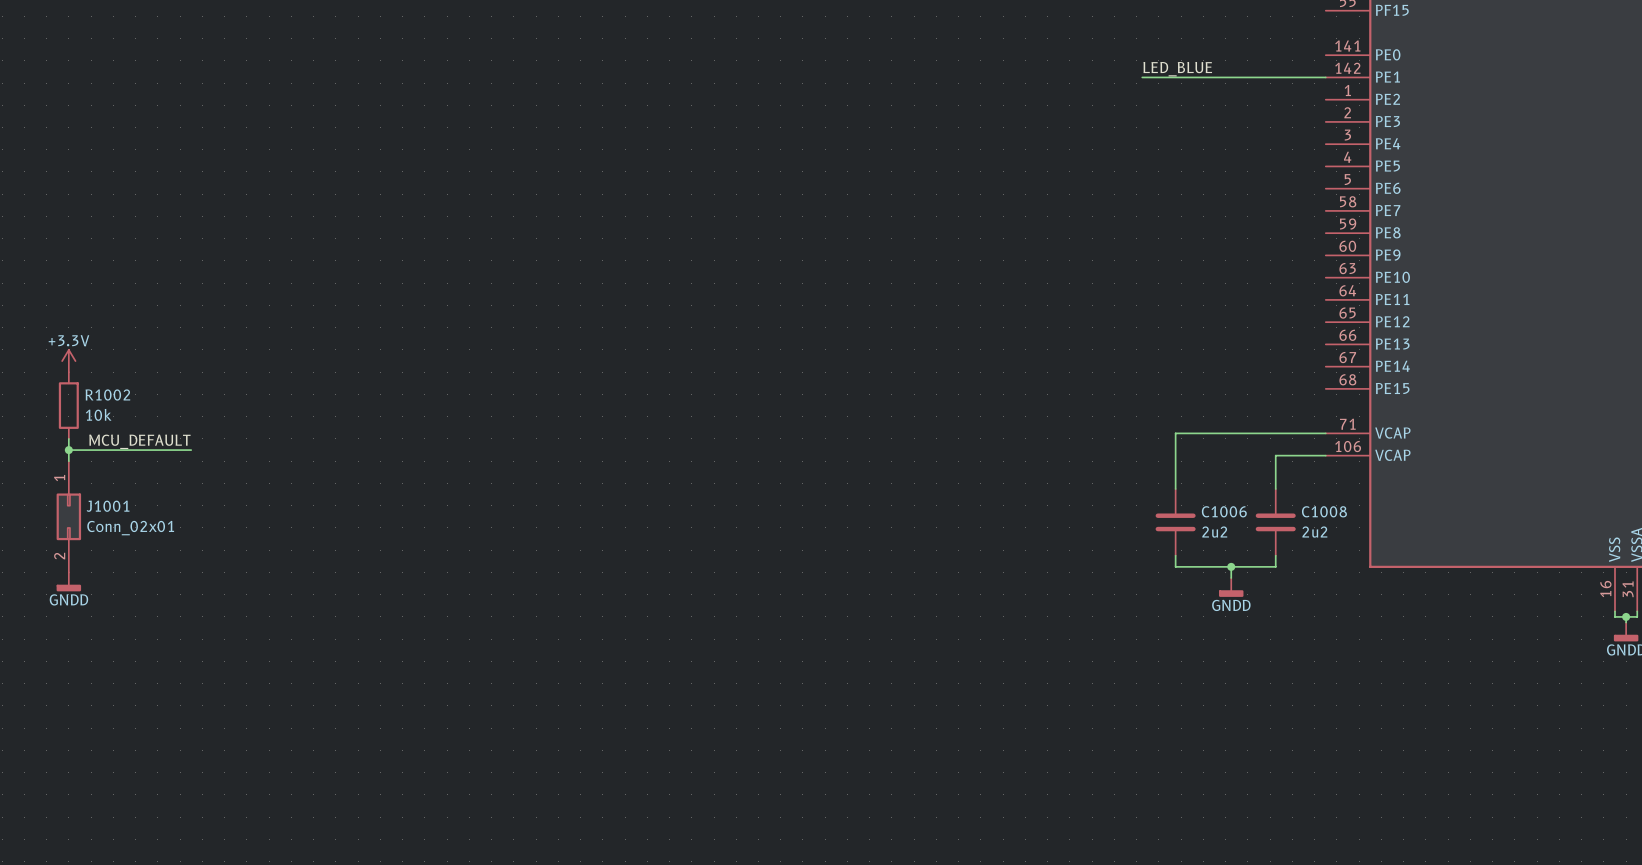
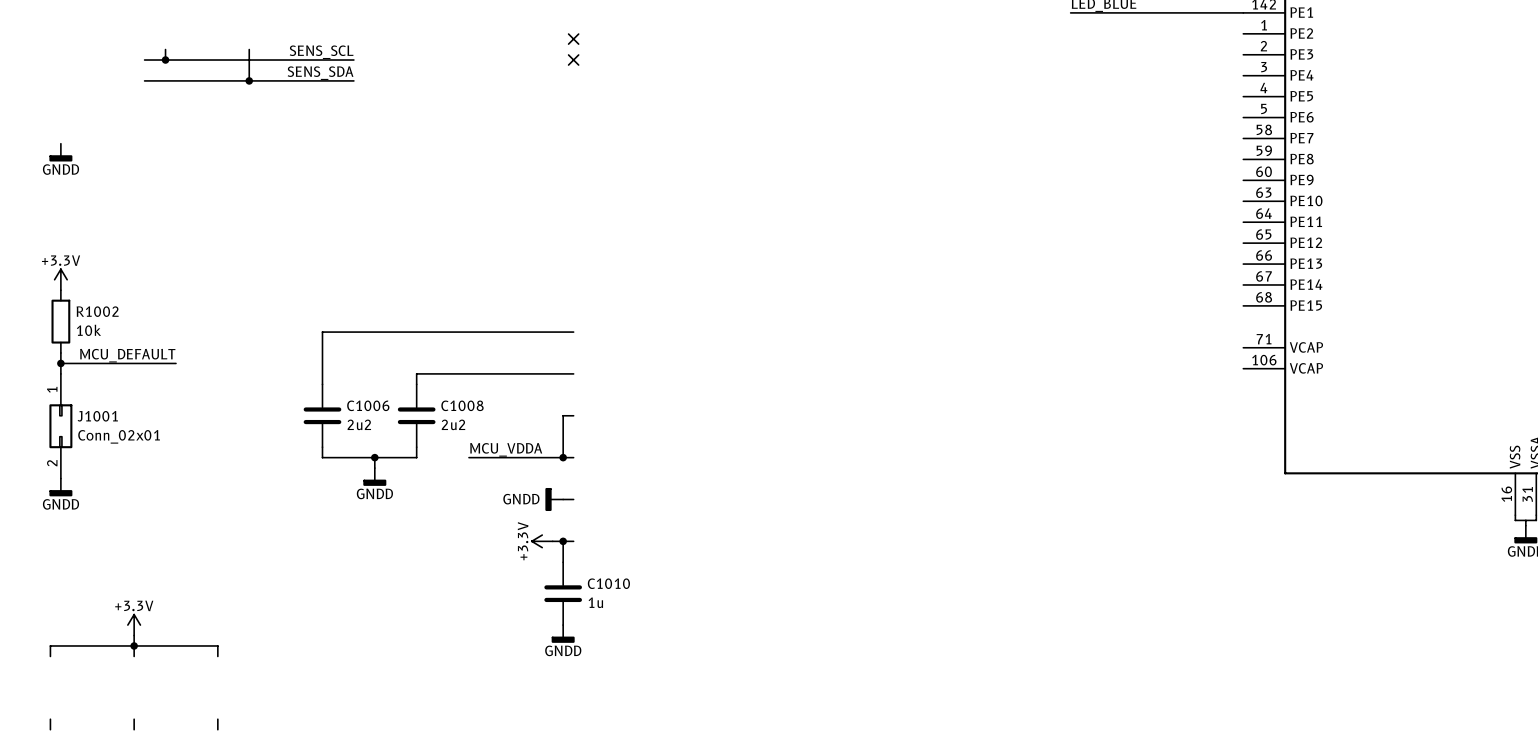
no-connect mark: none -> (573, 39)
wire: none -> (165, 49) (165, 60)
wire: none -> (249, 49) (249, 80)
label: none -> SENS_SCL (321, 52)
wire: none -> (144, 60) (353, 60)
junction: none -> (165, 60)
no-connect mark: none -> (573, 60)
label: none -> SENS_SDA (320, 73)
wire: none -> (144, 80) (353, 80)
junction: none -> (249, 80)
power symbol: none -> GNDD (60, 152)
wire: none -> (573, 332) (322, 332) (322, 384)
wire: (1325, 433) (1175, 433) (1175, 489) -> none
wire: (1325, 455) (1275, 455) (1275, 489) -> none
wire: none -> (573, 373) (416, 373) (416, 384)
wire: none -> (573, 415) (563, 415) (563, 457)
C1006 position: (1175, 522) -> (322, 415)
C1008 position: (1275, 522) -> (416, 415)
wire: none -> (322, 447) (322, 457) (416, 457) (416, 447)
label: none -> MCU_VDDA (506, 449)
wire: none -> (374, 457) (374, 468)
junction: none -> (374, 457)
wire: none -> (468, 457) (573, 457)
junction: none -> (563, 457)
wire: (1175, 555) (1175, 566) (1275, 566) (1275, 555) -> none
wire: (1231, 566) (1231, 578) -> none
junction: (1231, 566) -> none
power symbol: none -> GNDD (374, 476)
power symbol: GNDD (1231, 587) -> none
power symbol: none -> GNDD (554, 499)
wire: none -> (563, 499) (573, 499)
junction: (1626, 616) -> none
power symbol: none -> +3.3V (542, 541)
wire: none -> (552, 541) (573, 541)
wire: none -> (563, 541) (563, 562)
junction: none -> (563, 541)
C1010: none -> 1u (563, 593)
power symbol: none -> +3.3V (134, 625)
power symbol: none -> GNDD (563, 633)
wire: none -> (134, 635) (134, 656)
junction: none -> (134, 645)
wire: none -> (50, 656) (50, 645) (217, 645) (217, 656)
wire: none -> (50, 719) (50, 729)
wire: none -> (134, 719) (134, 729)
wire: none -> (217, 719) (217, 729)

